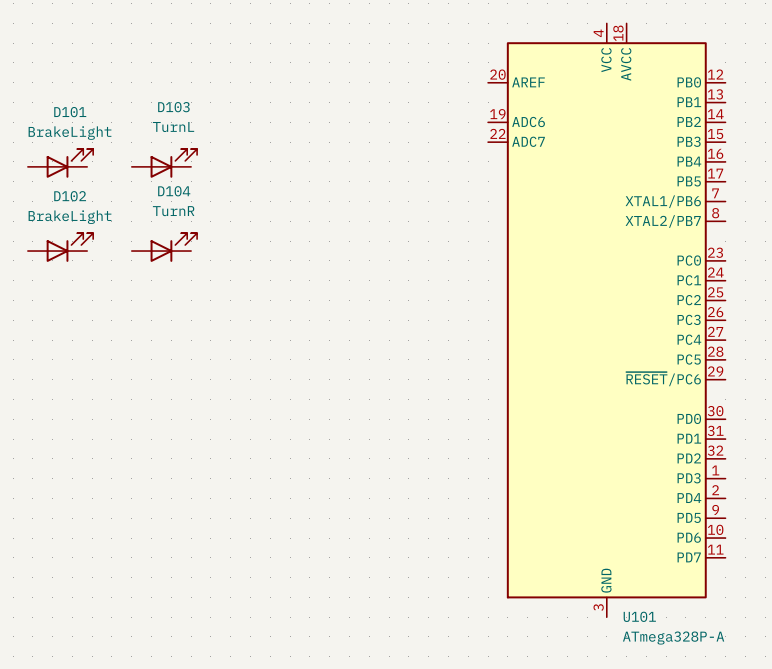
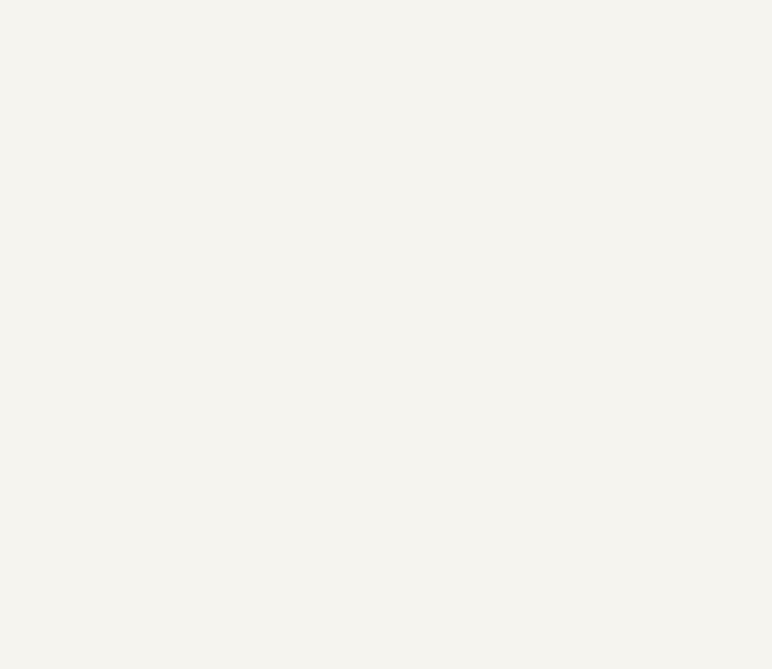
D101: BrakeLight (60, 163) -> none
D103: TurnL (164, 163) -> none
D102: BrakeLight (60, 247) -> none
D104: TurnR (164, 247) -> none
U101: ATmega328P-A (606, 320) -> none

